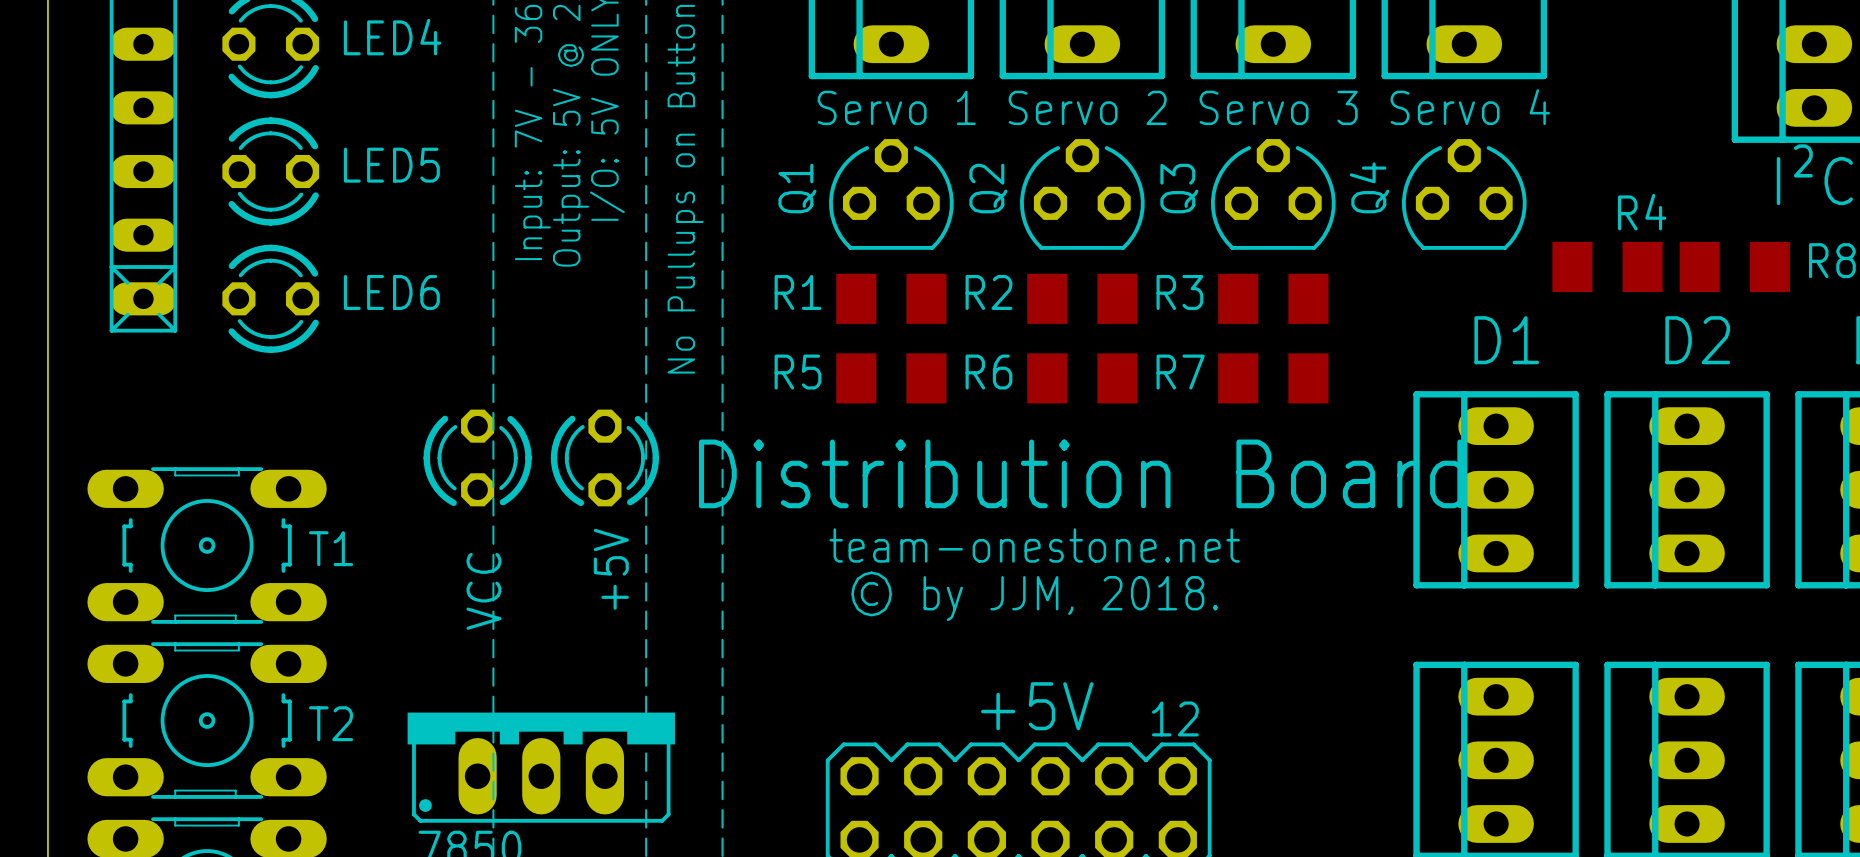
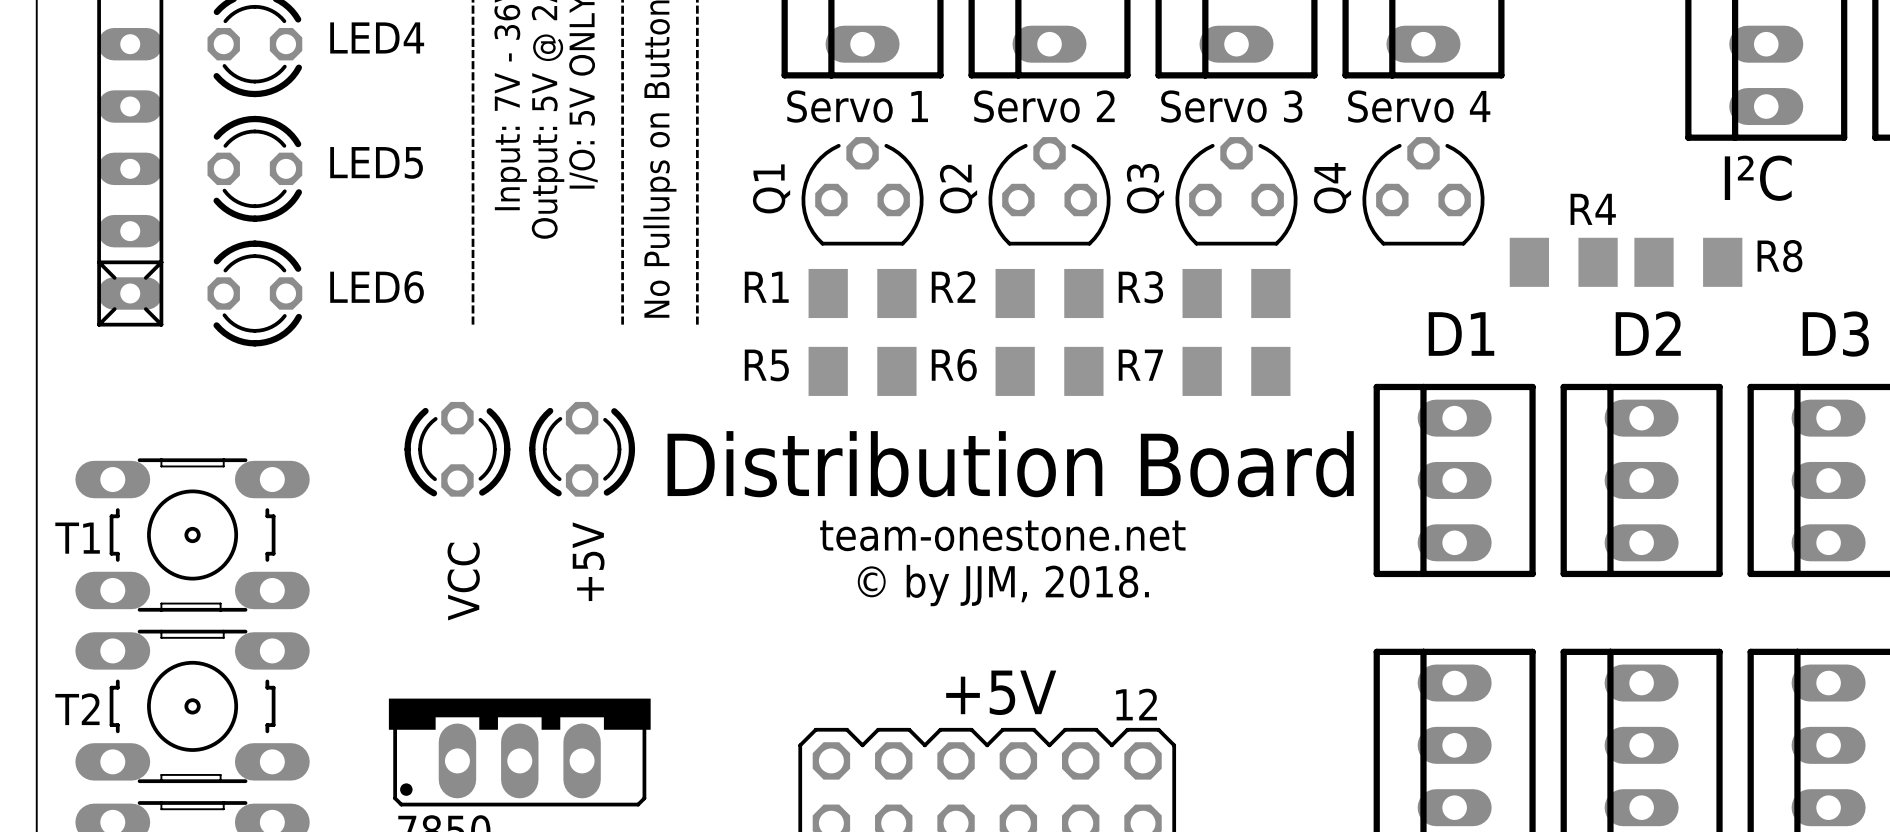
T1 name position: T1 (331, 548) -> T1 (77, 538)
T2 name position: T2 (331, 723) -> T2 (77, 709)

